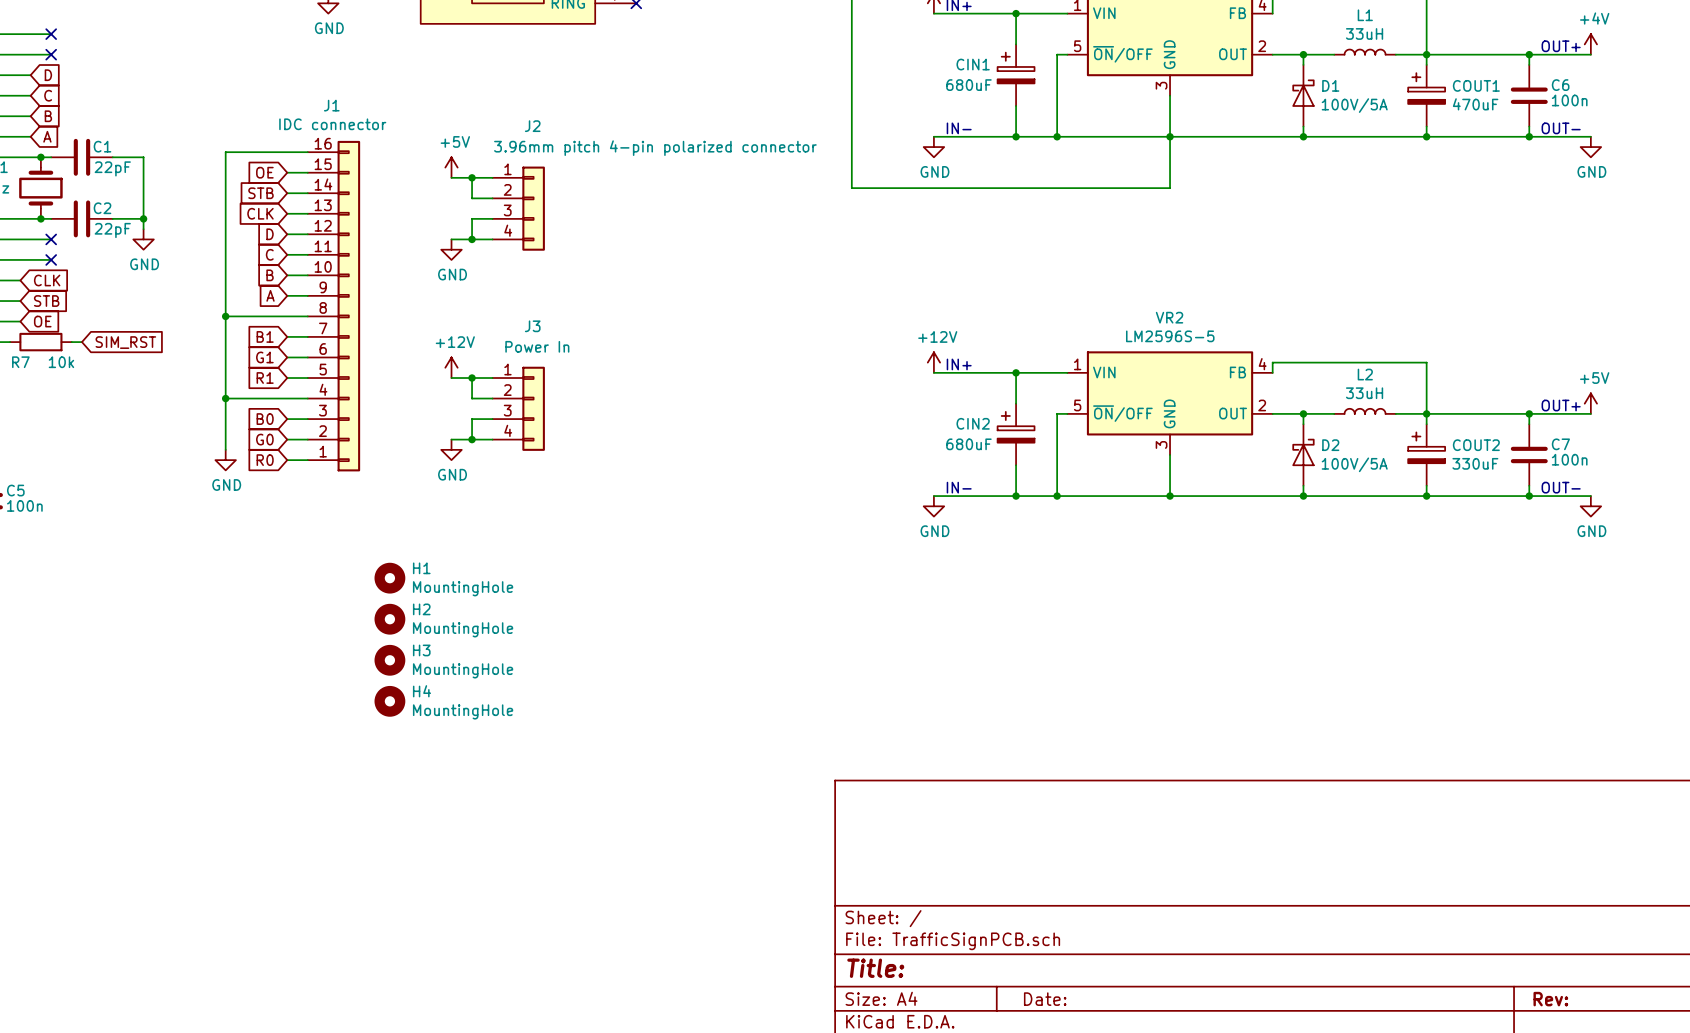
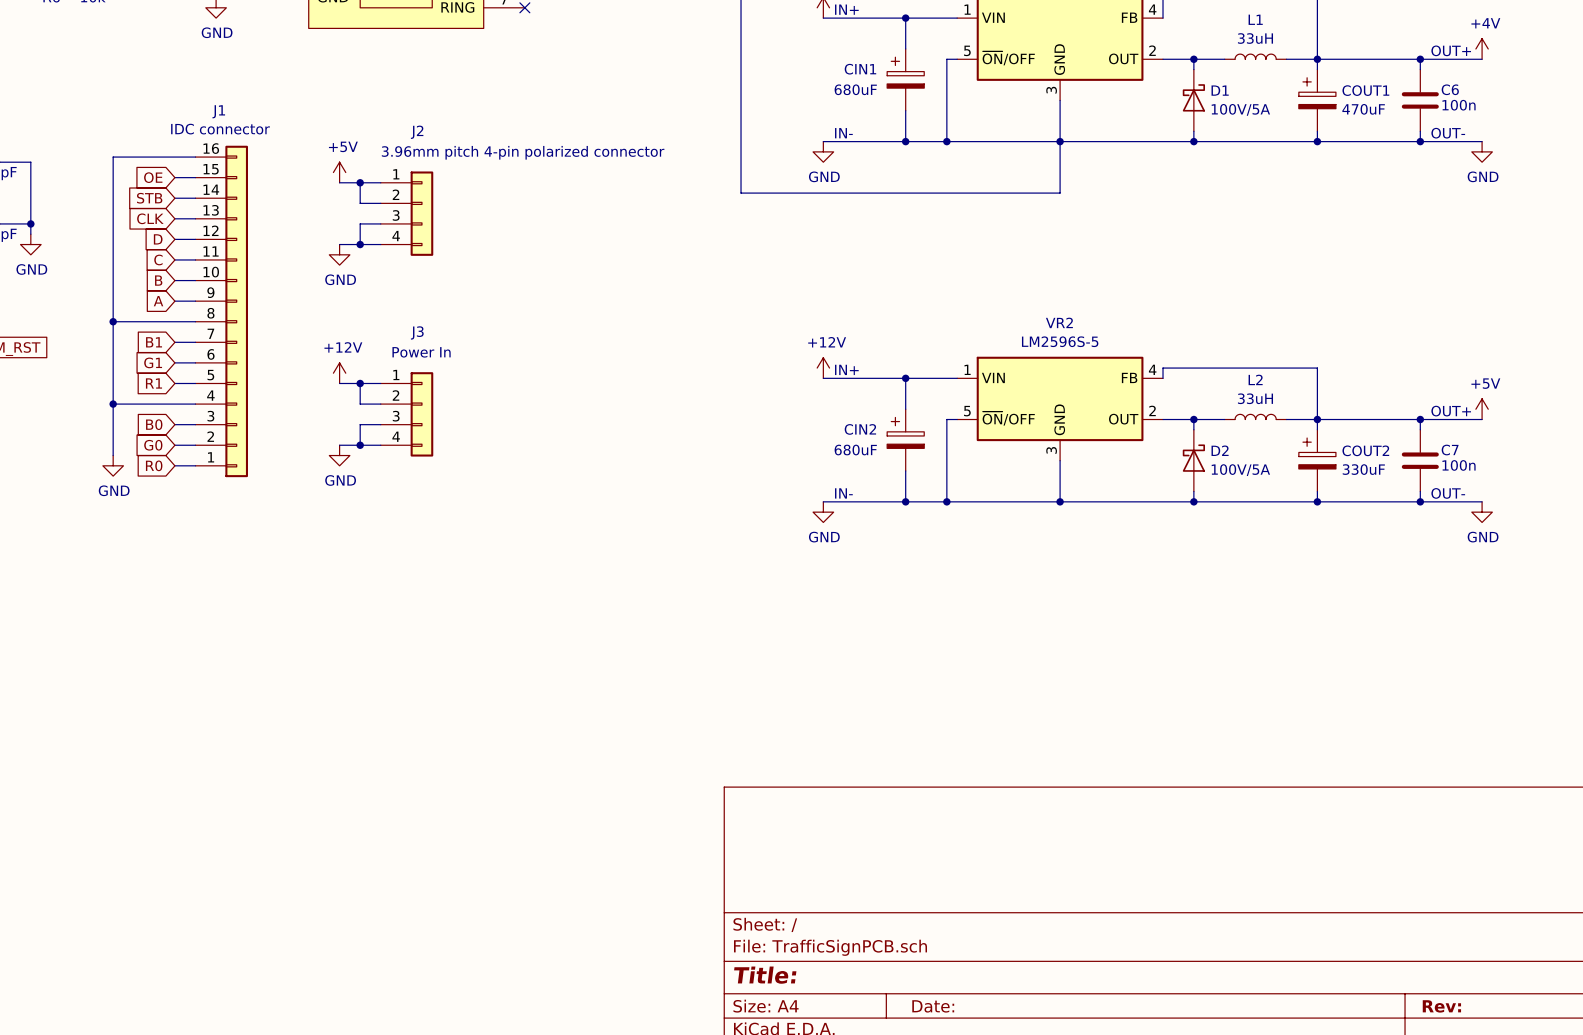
H1: MountingHole (389, 578) -> none
H2: MountingHole (389, 619) -> none
H3: MountingHole (389, 660) -> none
H4: MountingHole (389, 701) -> none

